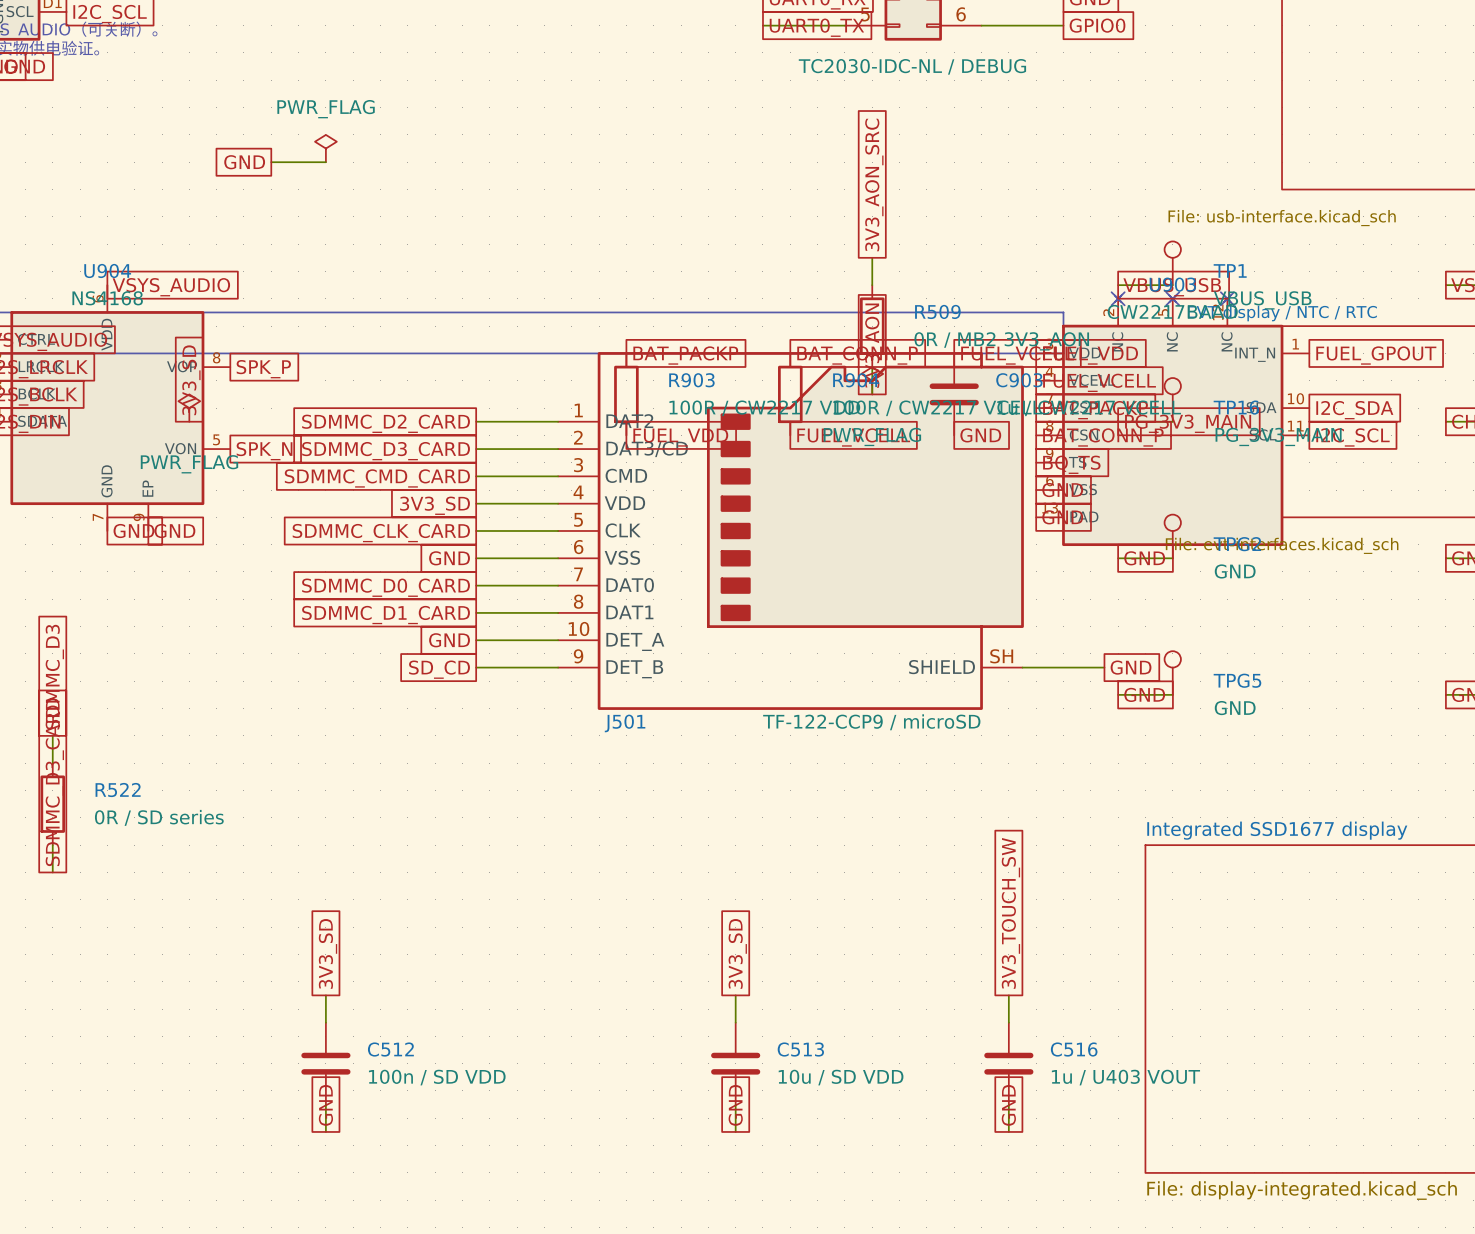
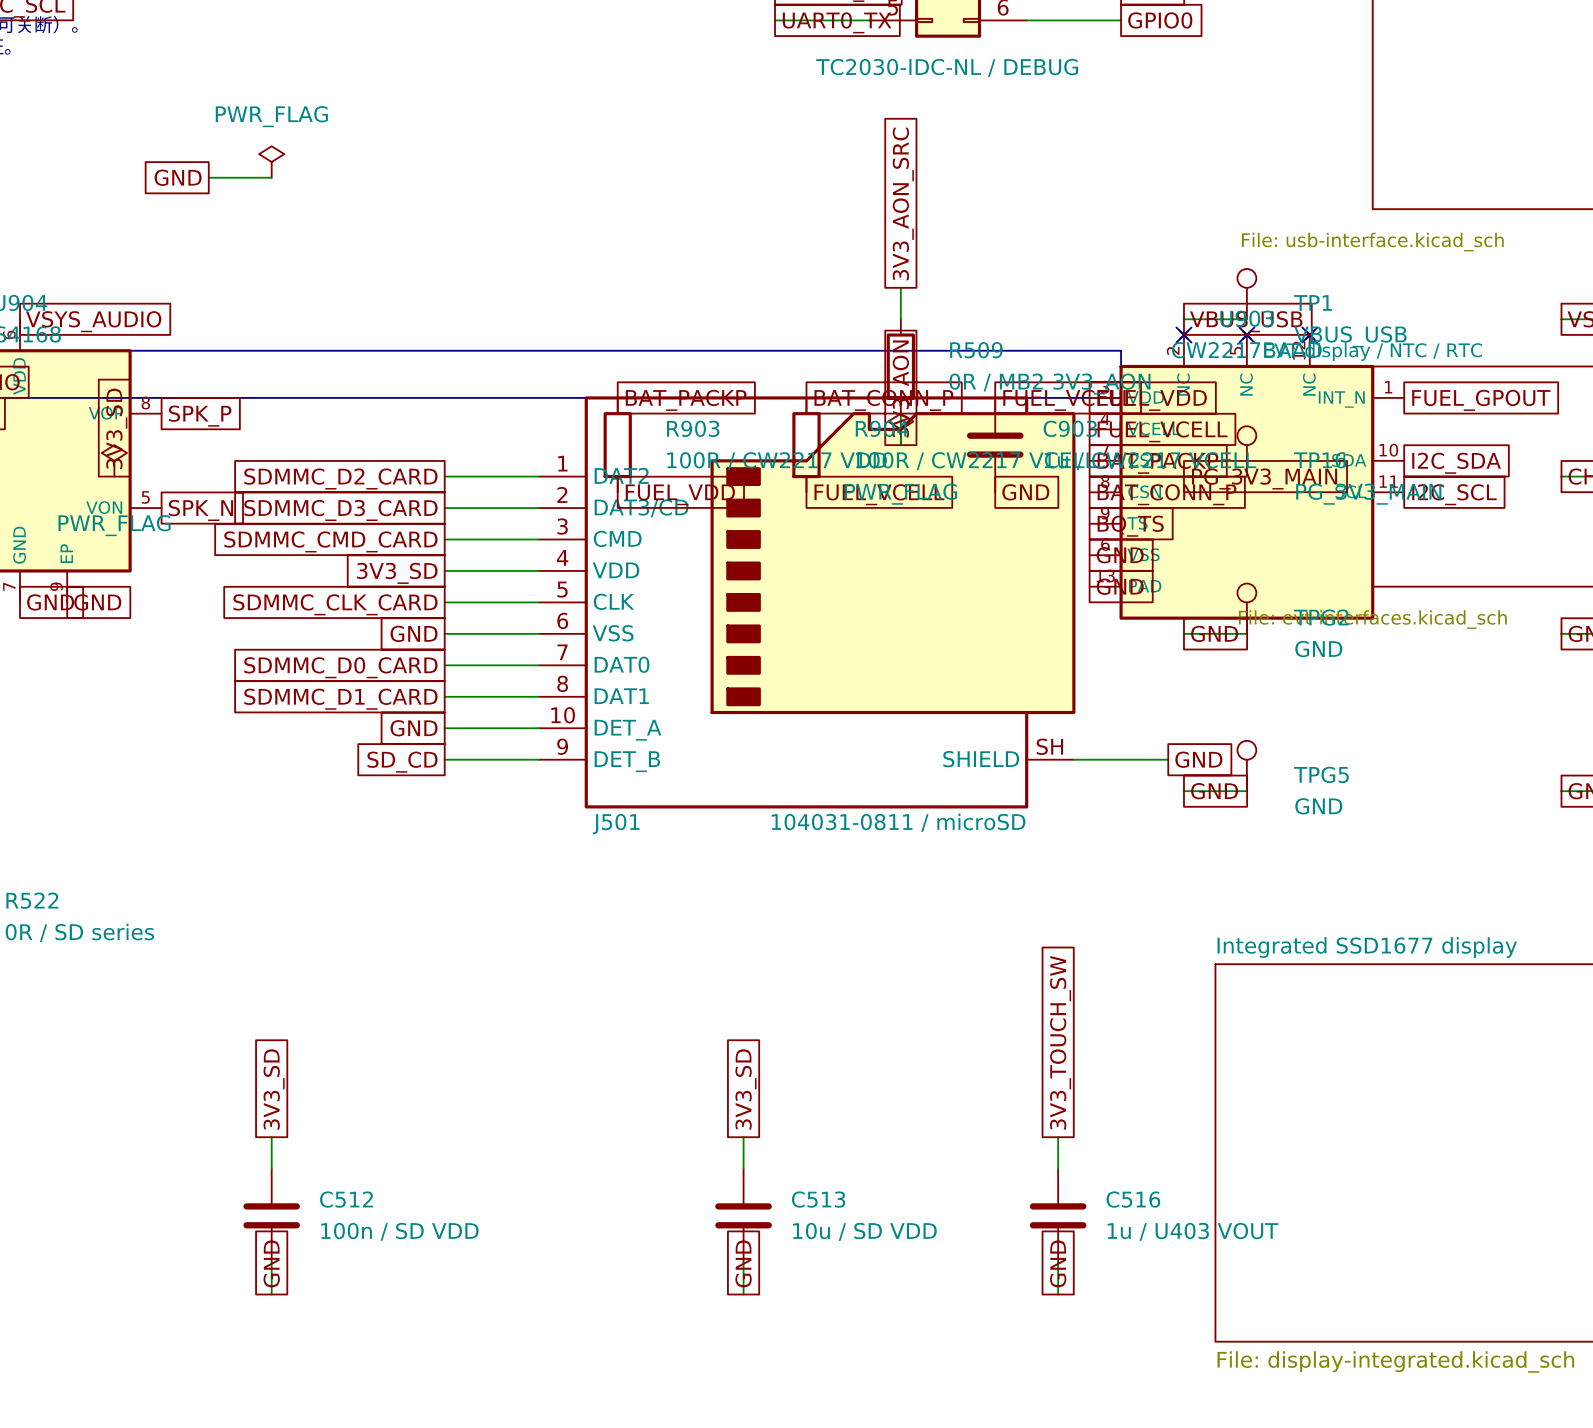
J501 value: TF-122-CCP9 / microSD (871, 722) -> 104031-0811 / microSD (898, 822)

